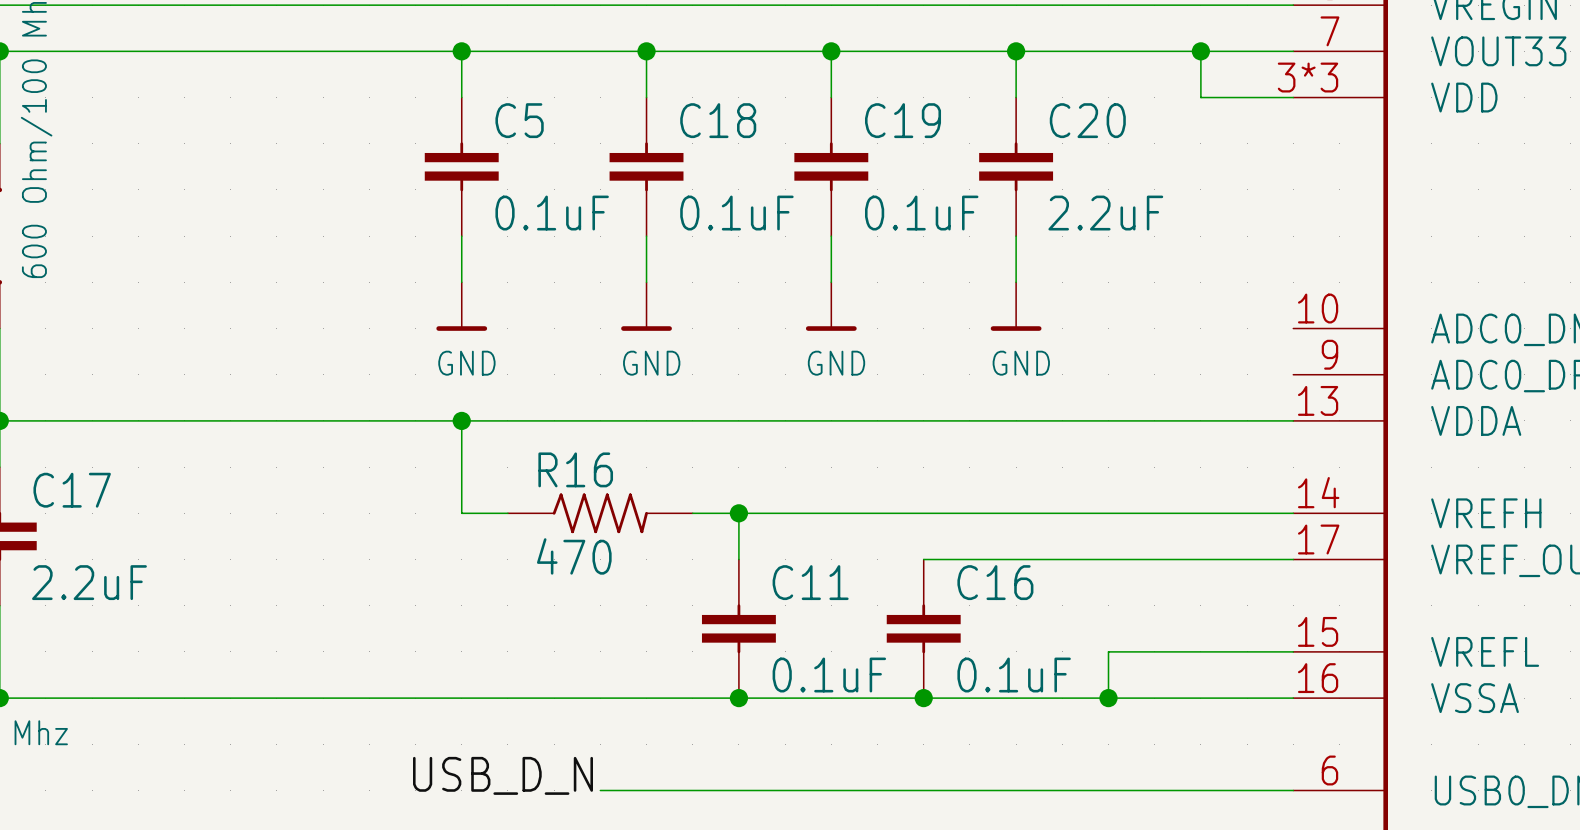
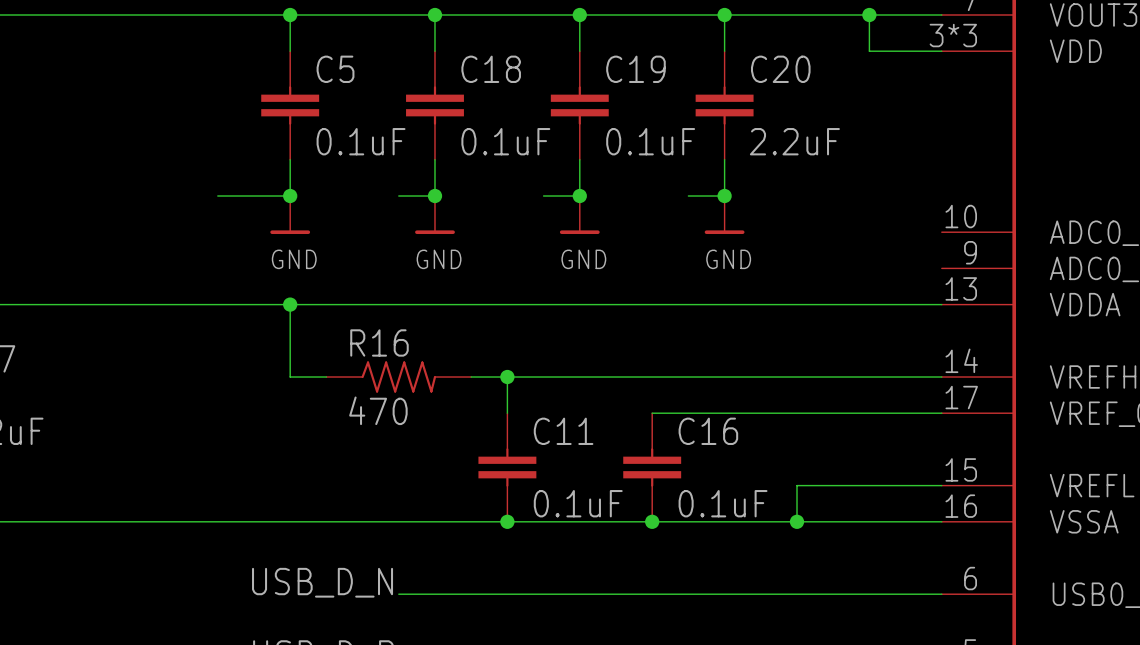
wire: none -> (217, 196) (290, 196)
junction: none -> (290, 196)
wire: none -> (398, 196) (434, 196)
junction: none -> (434, 196)
wire: none -> (543, 196) (579, 196)
junction: none -> (579, 196)
wire: none -> (688, 196) (724, 196)
junction: none -> (724, 196)

